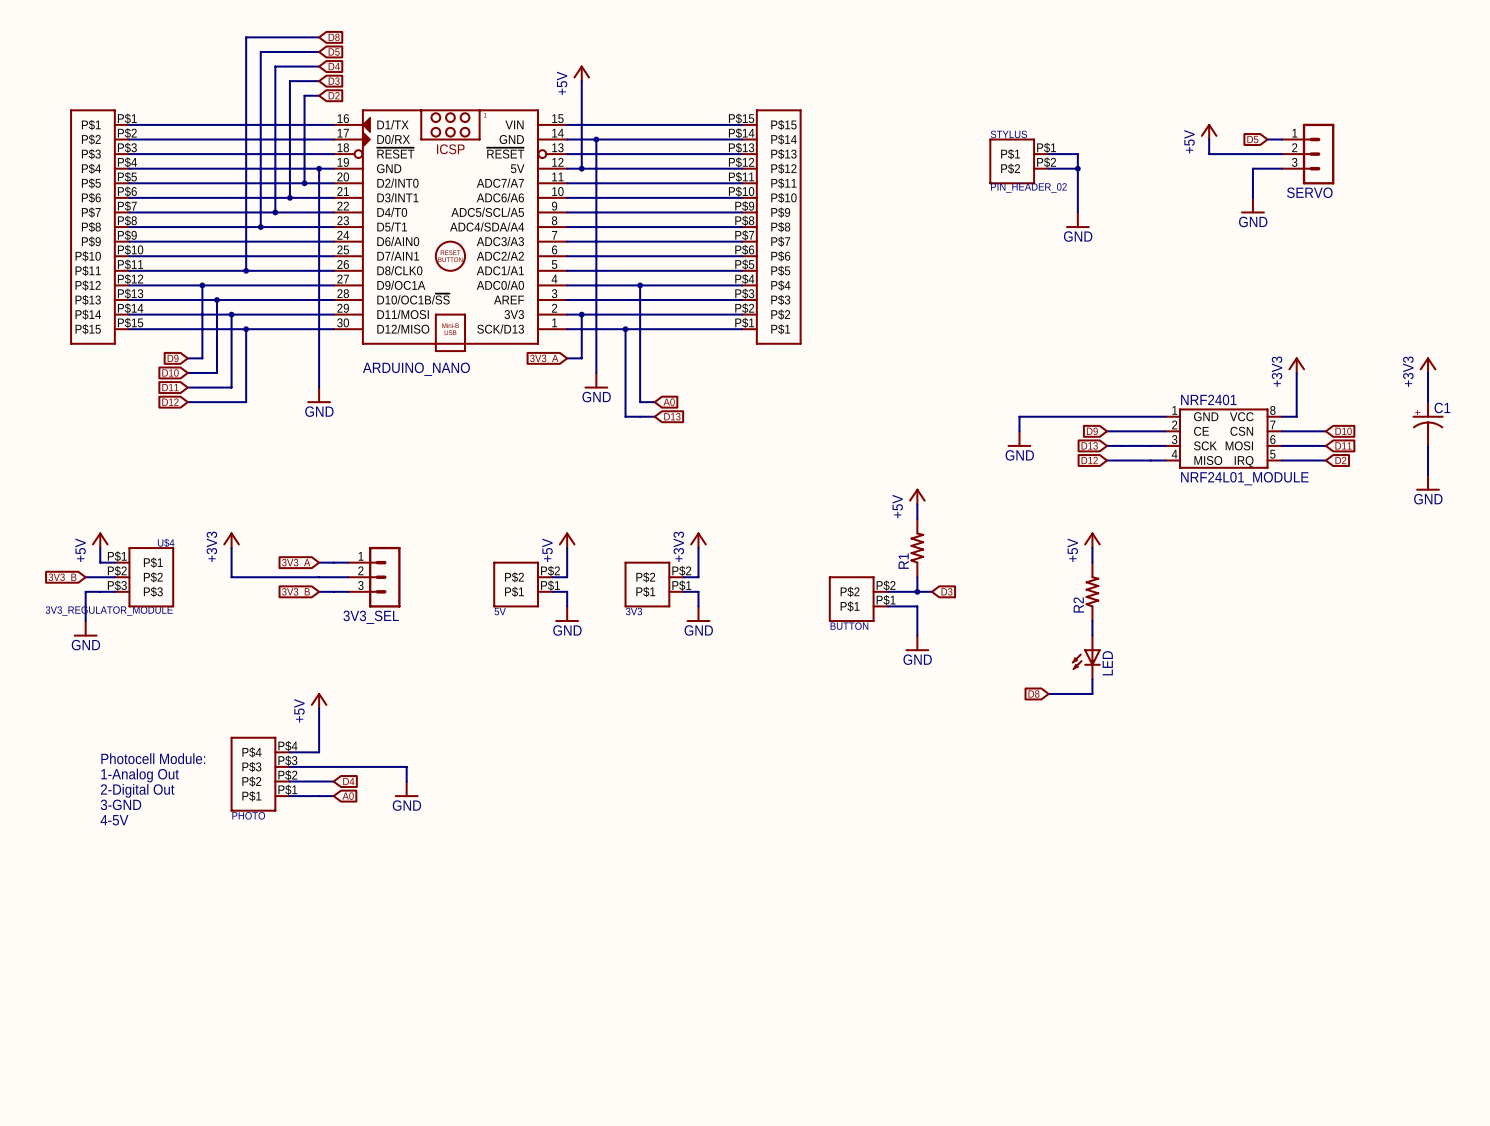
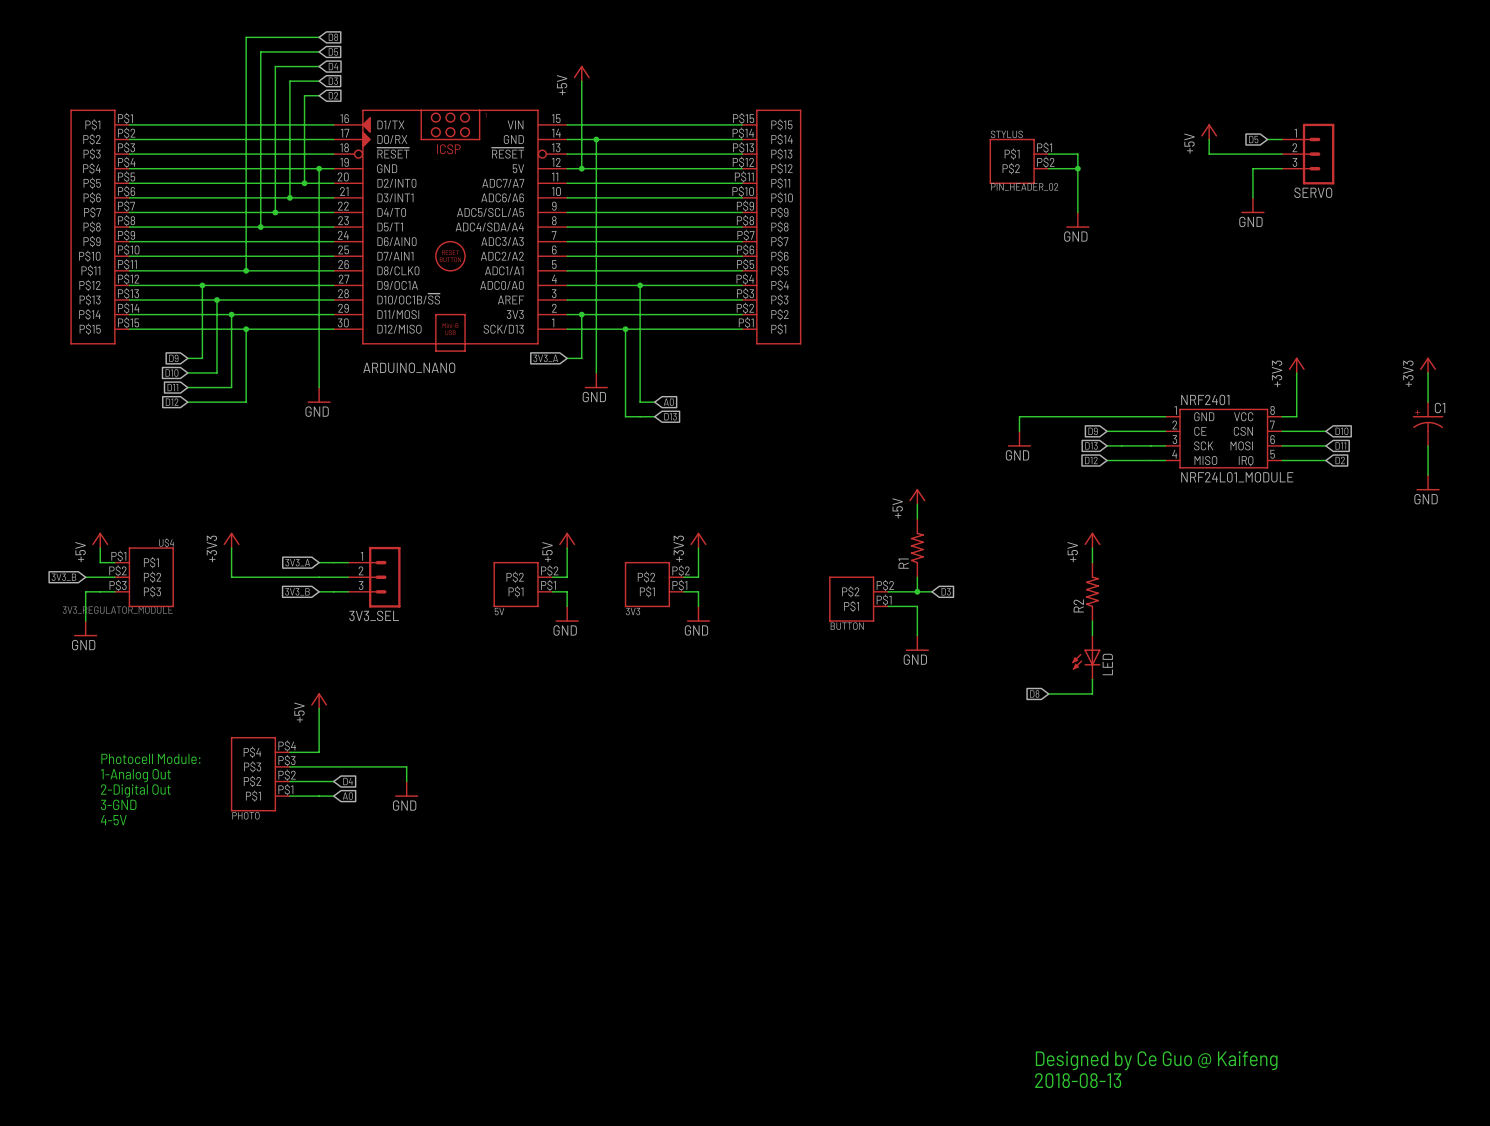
text: none -> Designed by Ce Guo @ Kaifeng (1156, 1060)
text: none -> 2018-08-13 (1078, 1080)

